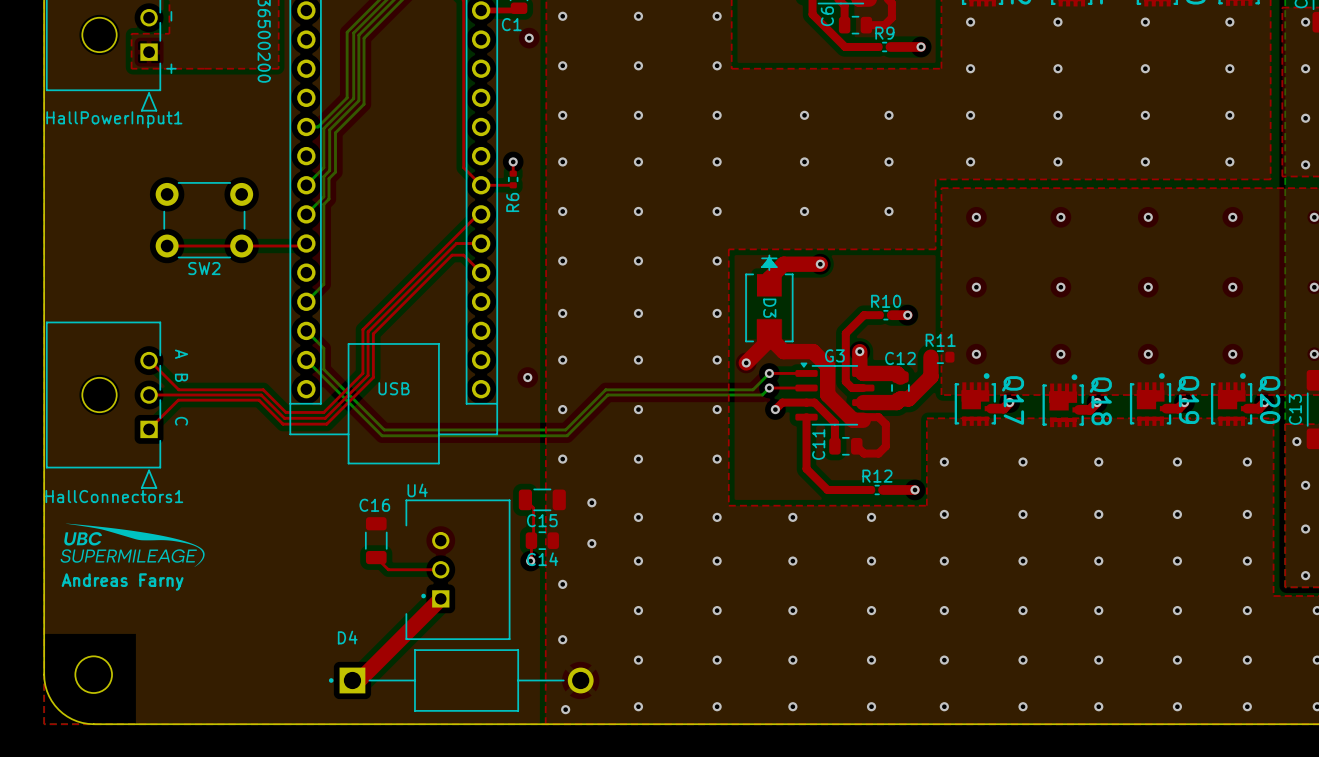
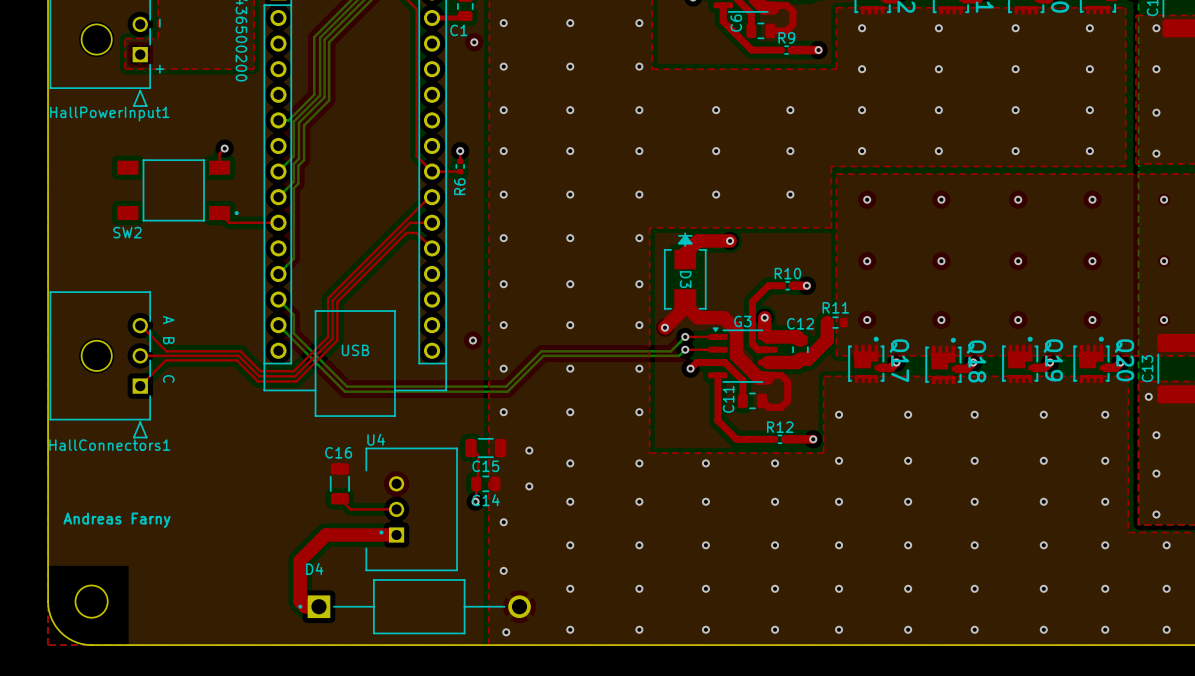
top track: none -> (224, 148) (219, 153) (219, 167)
via: none -> (224, 148)
SW2 footprint: [155, 182, 254, 259] -> [117, 159, 239, 222]
top track: none -> (219, 213) (229, 222) (278, 222)
top track: (167, 246) (303, 246) -> none
SW2 name position: SW2 (204, 268) -> SW2 (127, 232)
drawing: [60, 523, 205, 567] -> none
top track: (440, 598) (359, 680) (352, 680) -> (396, 535) (325, 535) (300, 560) (300, 601) (305, 606) (318, 606)

